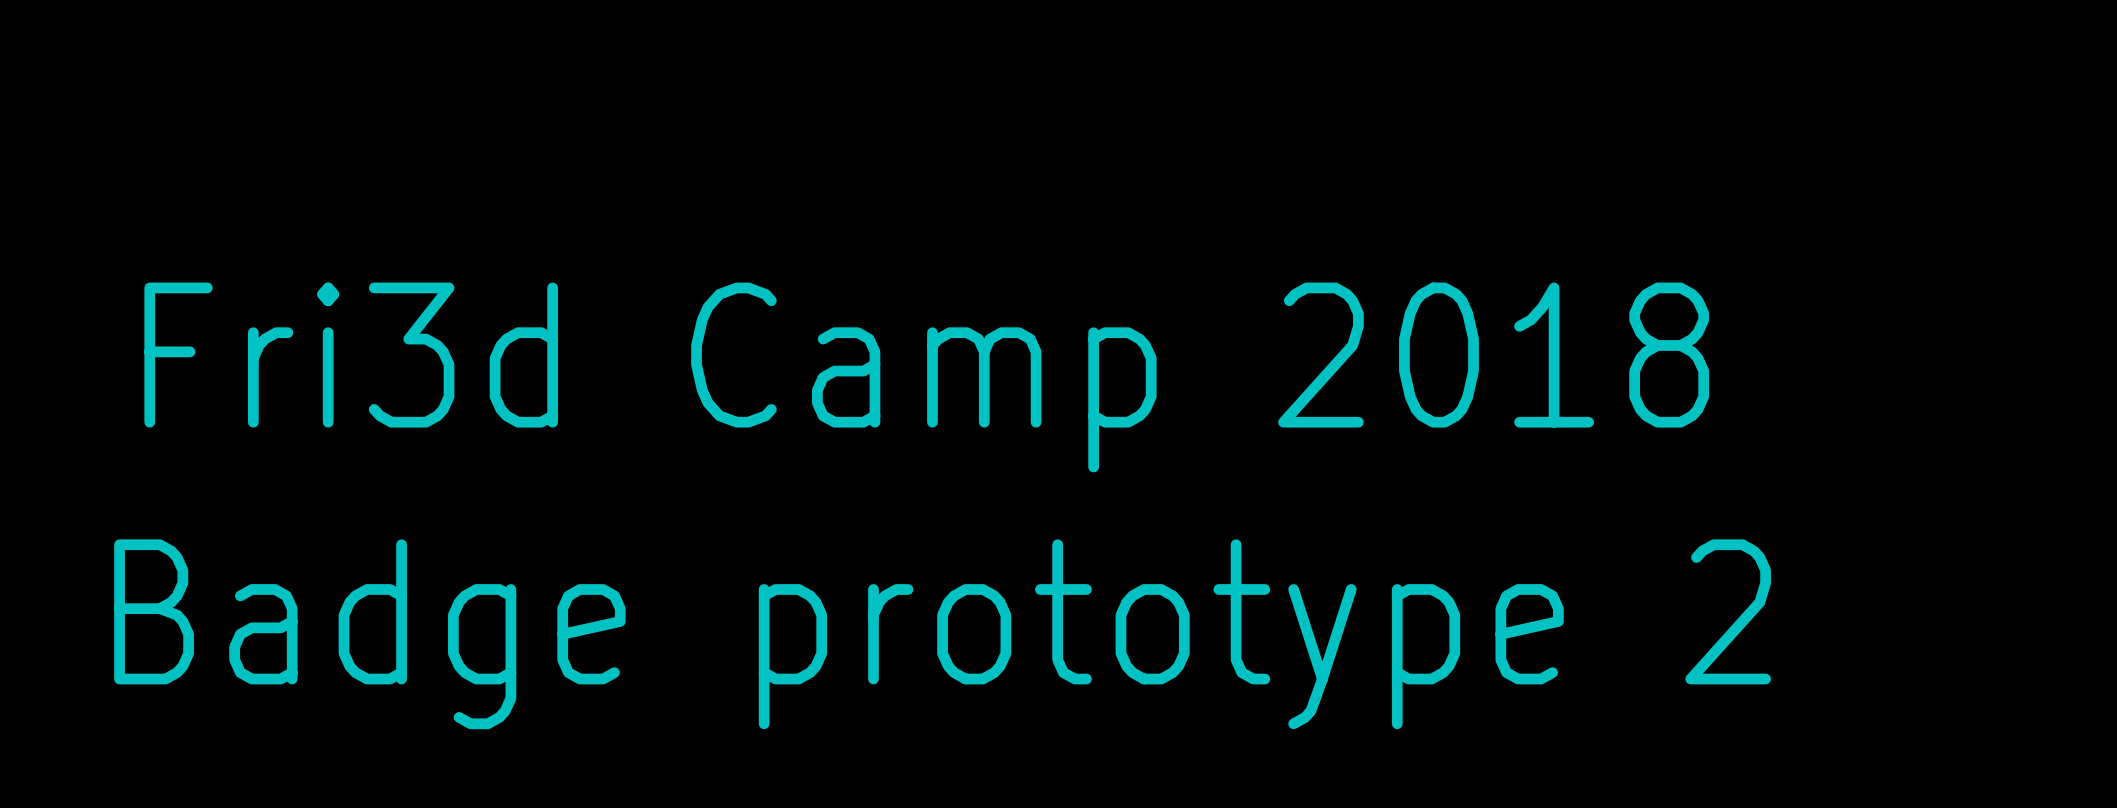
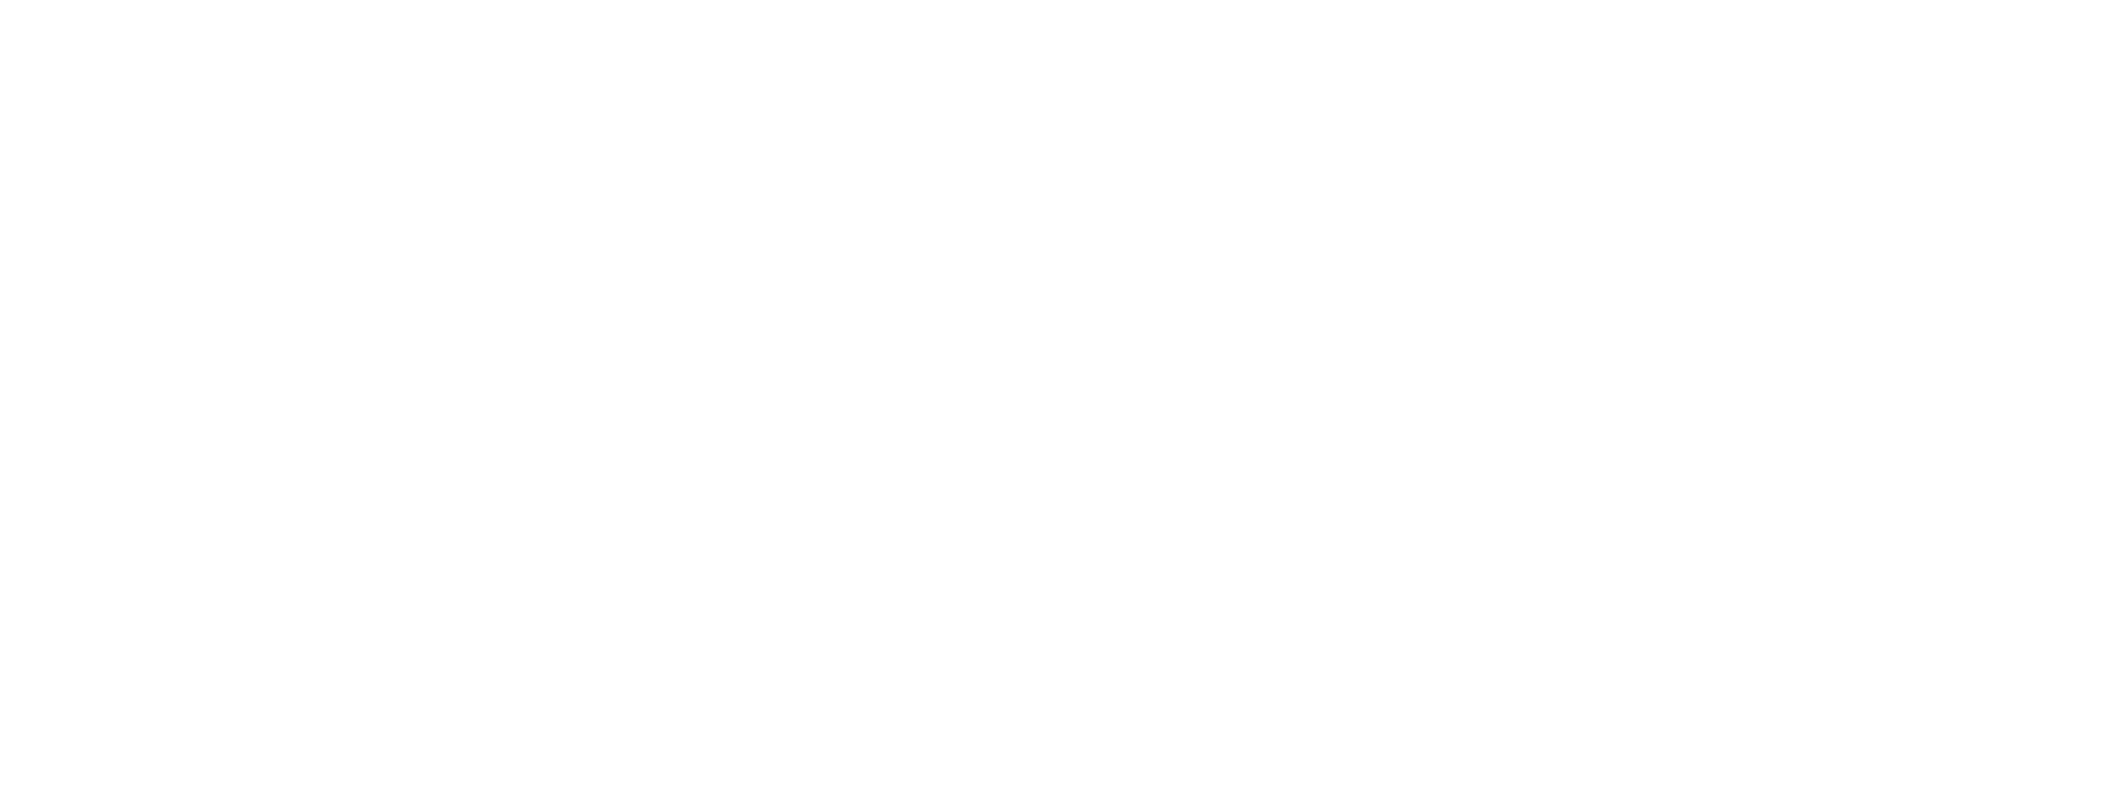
text: Fri3d Camp 2018 (926, 377) -> none
text: Badge prototype 2 (942, 634) -> none

